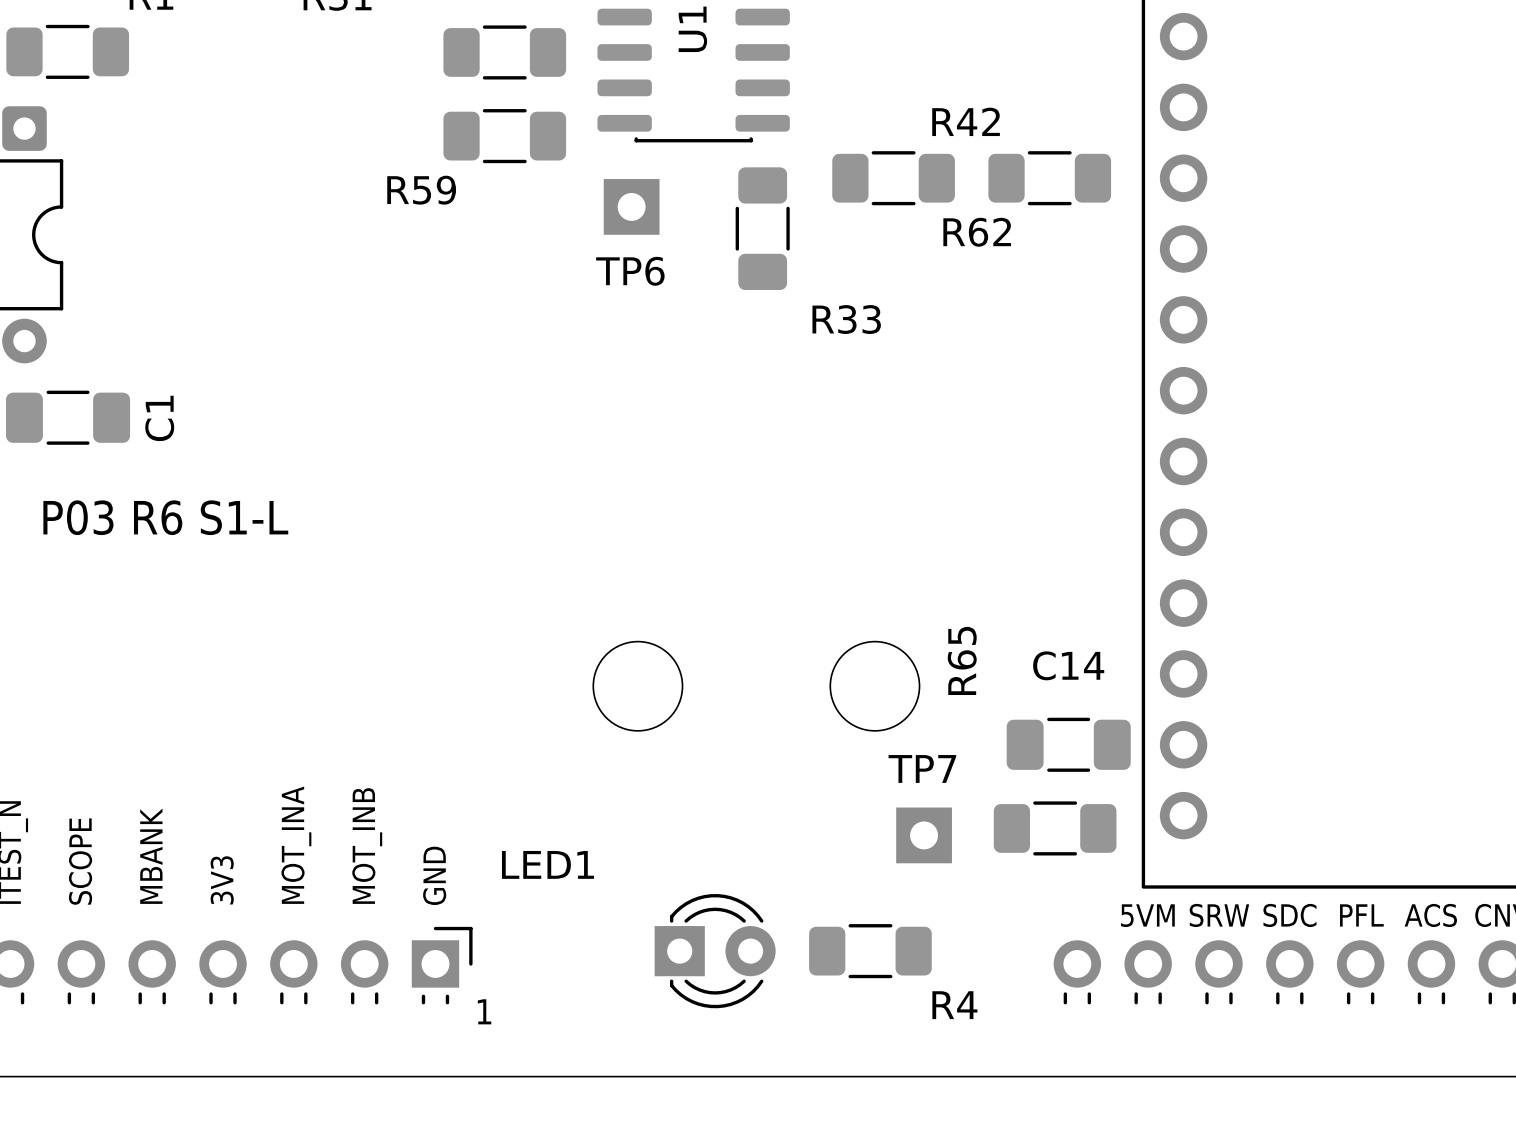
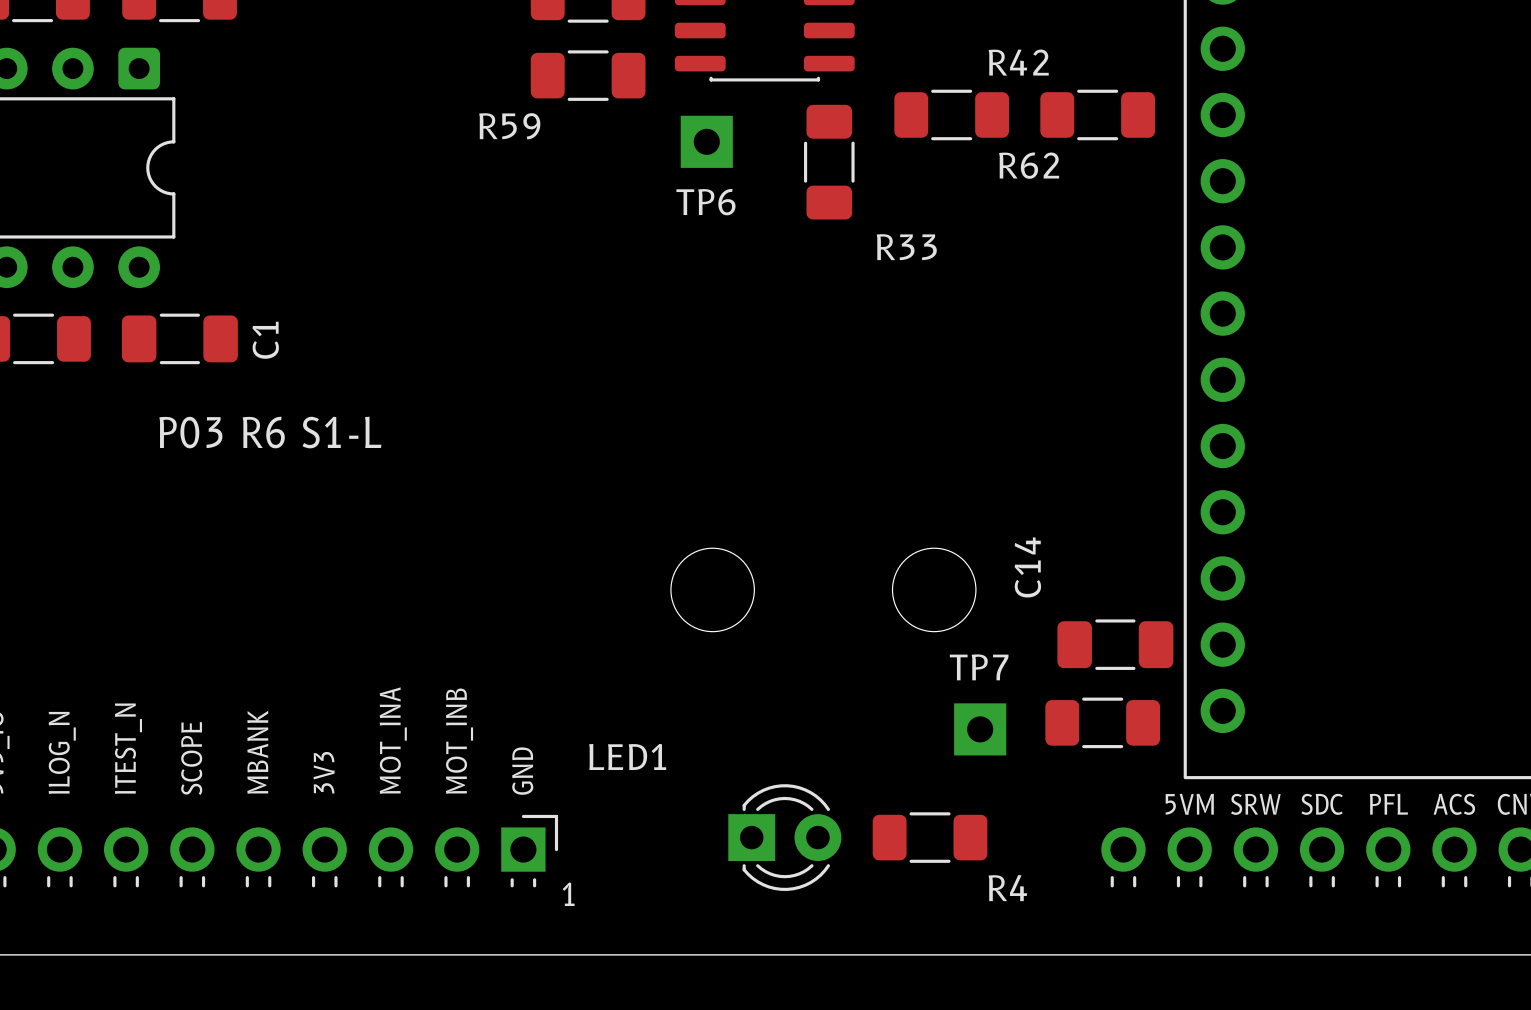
R65 name: R65 (962, 660) -> none
C14 name rotation: 0° (1068, 665) -> 90° counterclockwise (1027, 567)

